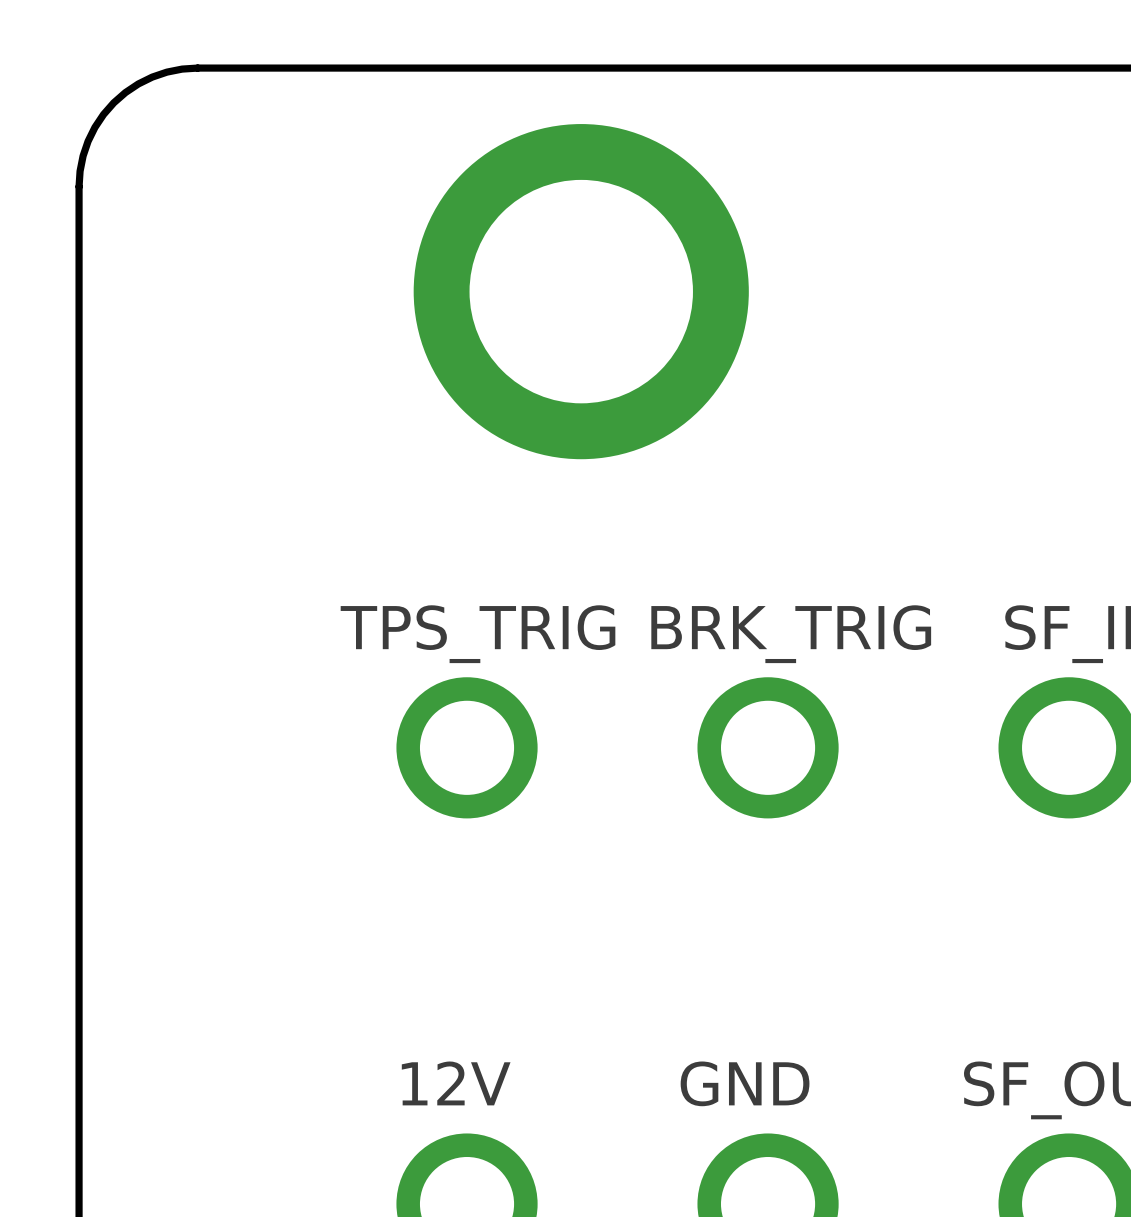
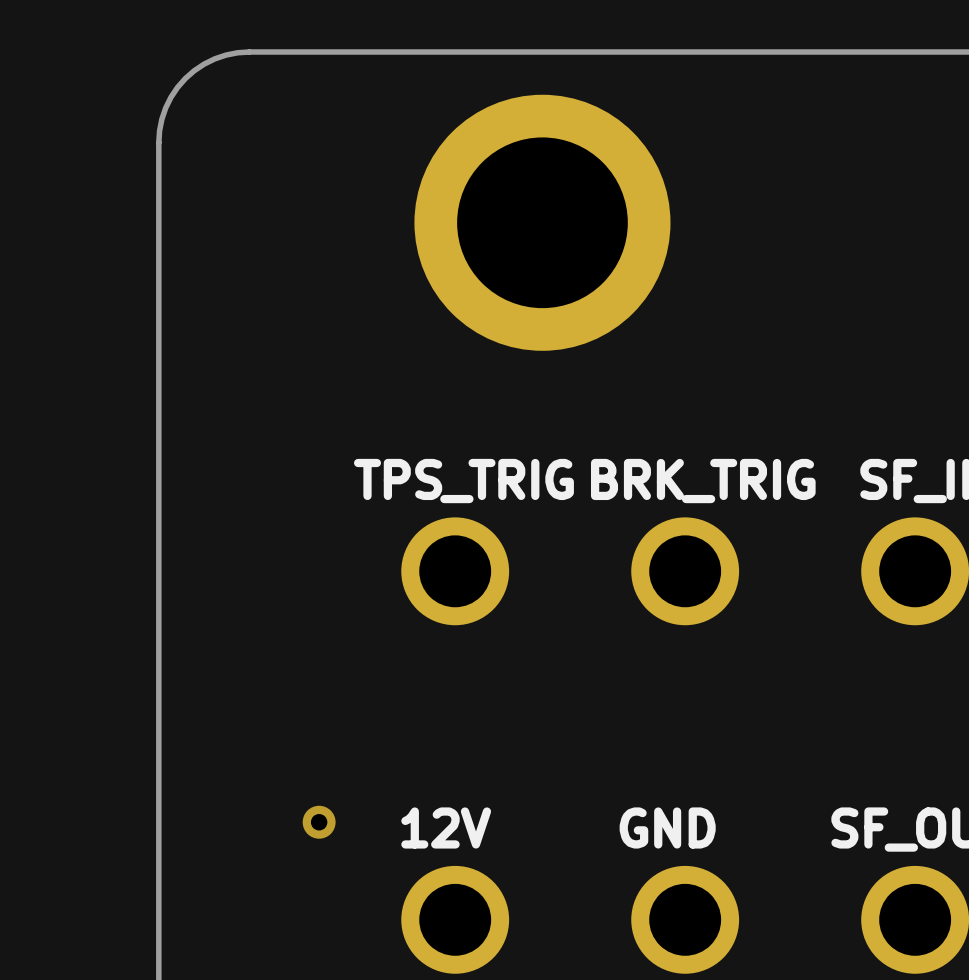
via: none -> (319, 822)

